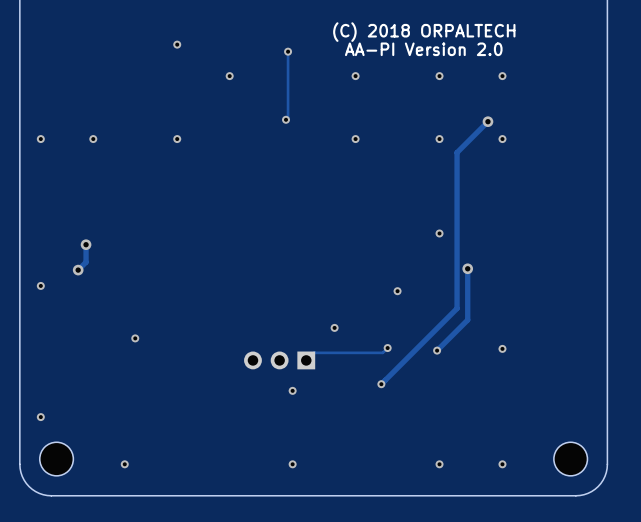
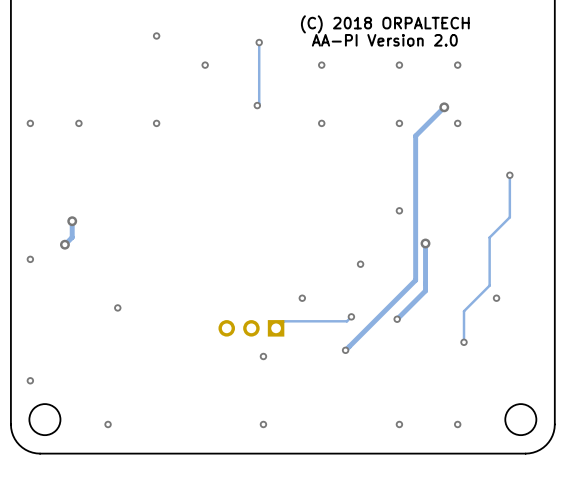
track: none -> (509, 175) (509, 217) (489, 237) (489, 285) (464, 311) (464, 342)
via: none -> (509, 175)
via: none -> (496, 298)
via: (502, 348) -> none
via: none -> (464, 342)

